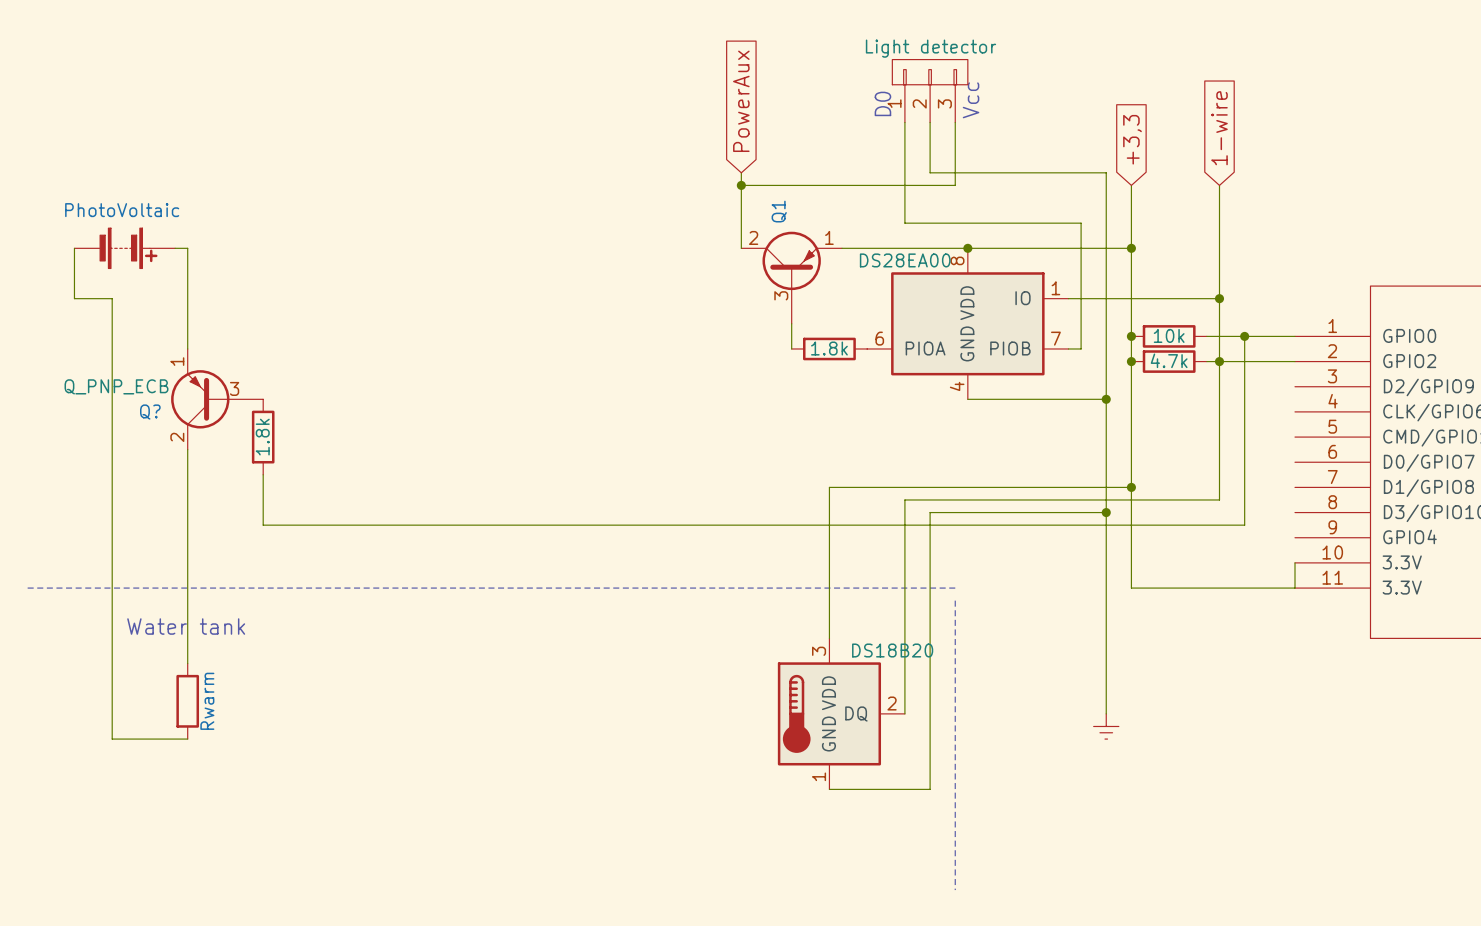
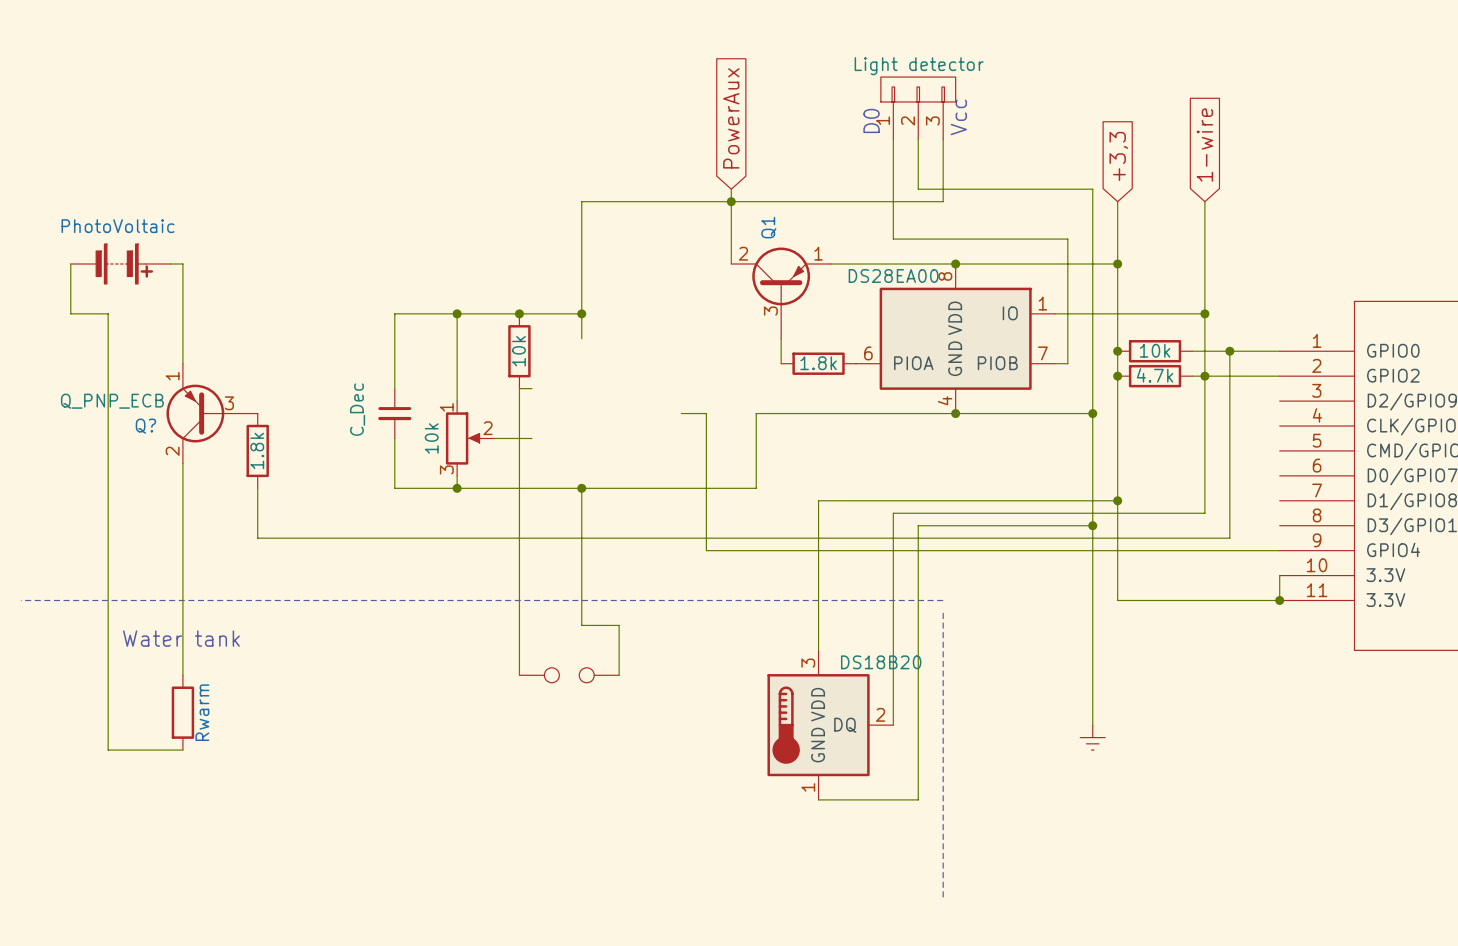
wire: none -> (731, 201) (581, 201) (581, 338)
wire: none -> (457, 313) (457, 401)
junction: none -> (457, 313)
junction: none -> (519, 313)
wire: none -> (581, 313) (394, 313) (394, 388)
junction: none -> (581, 313)
part: none -> 10k (519, 351)
wire: none -> (531, 388) (519, 388) (519, 675)
part: none -> C_Dec (394, 413)
wire: none -> (681, 413) (706, 413) (706, 550) (1279, 550)
wire: none -> (955, 413) (756, 413) (756, 488) (394, 488) (394, 438)
junction: none -> (955, 413)
part: none -> 10k (470, 438)
wire: none -> (494, 438) (531, 438)
wire: none -> (457, 475) (457, 488)
junction: none -> (457, 488)
wire: none -> (581, 488) (581, 625) (619, 625) (619, 675)
junction: none -> (581, 488)
junction: none -> (1279, 600)
part: none -> (569, 675)

